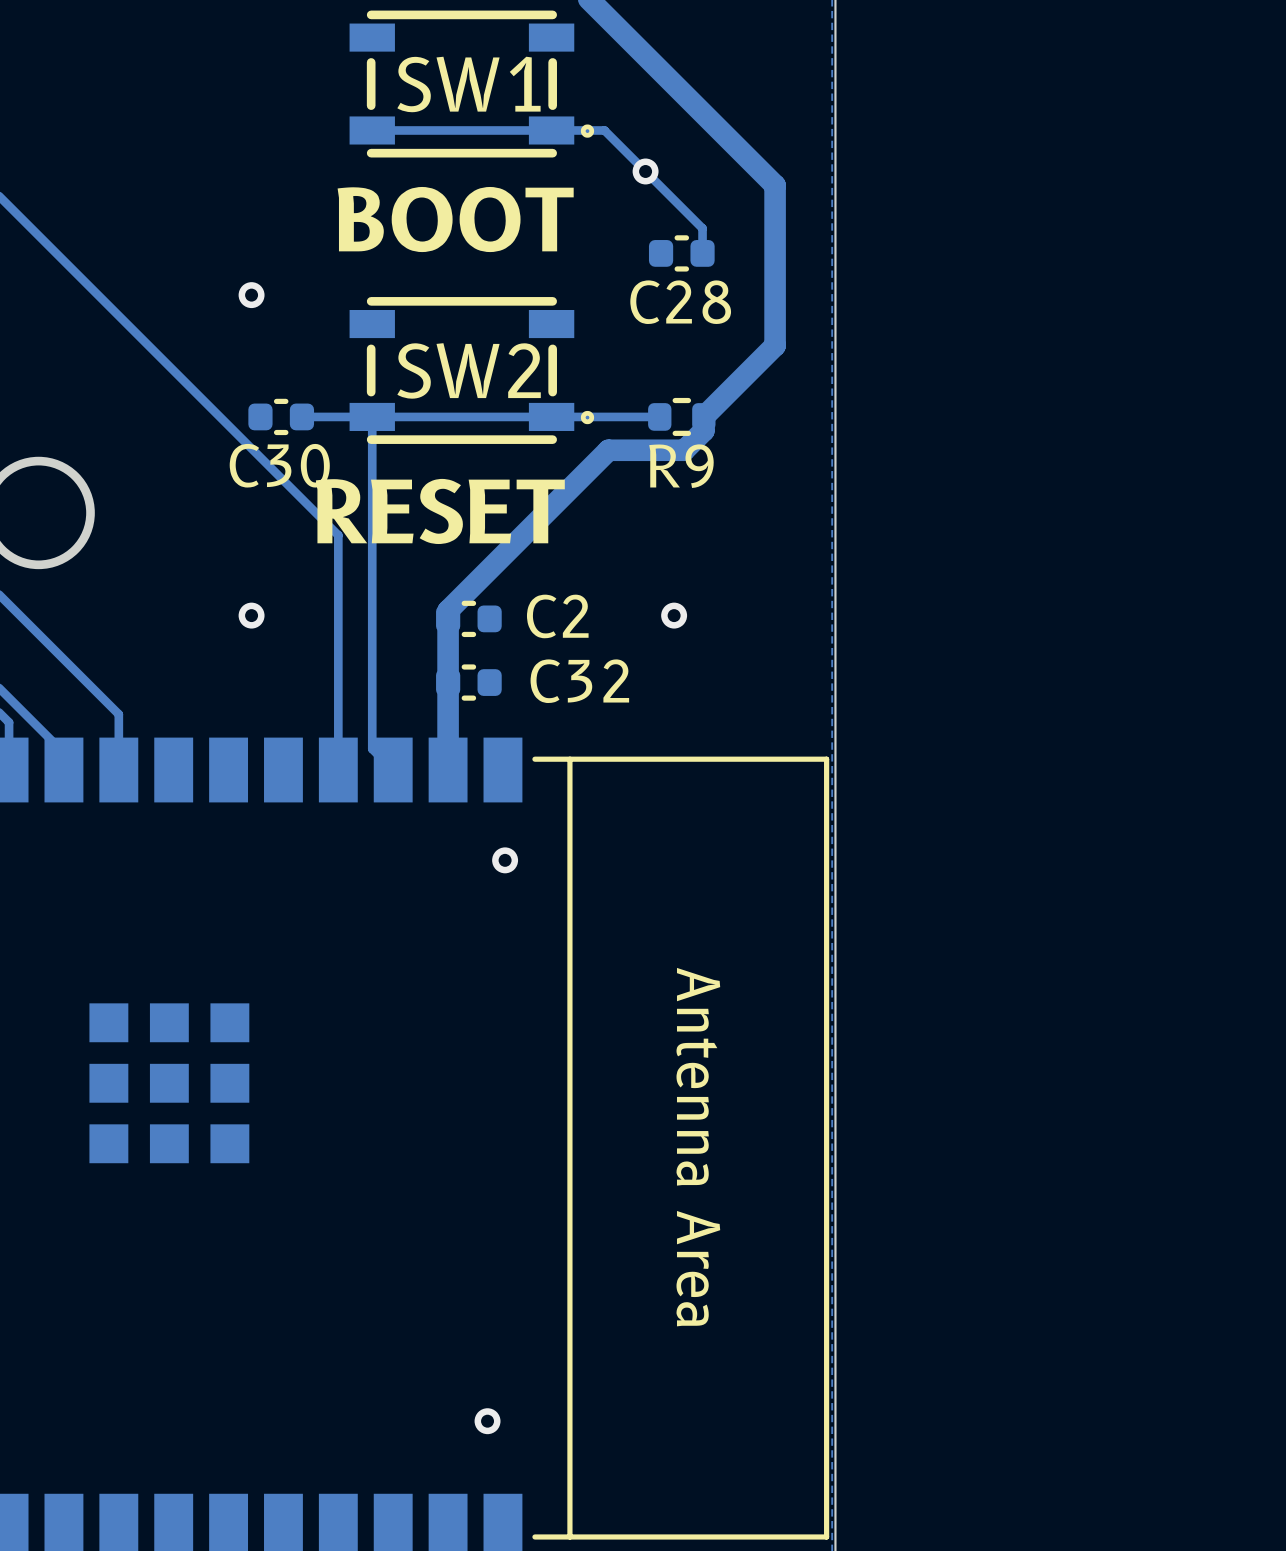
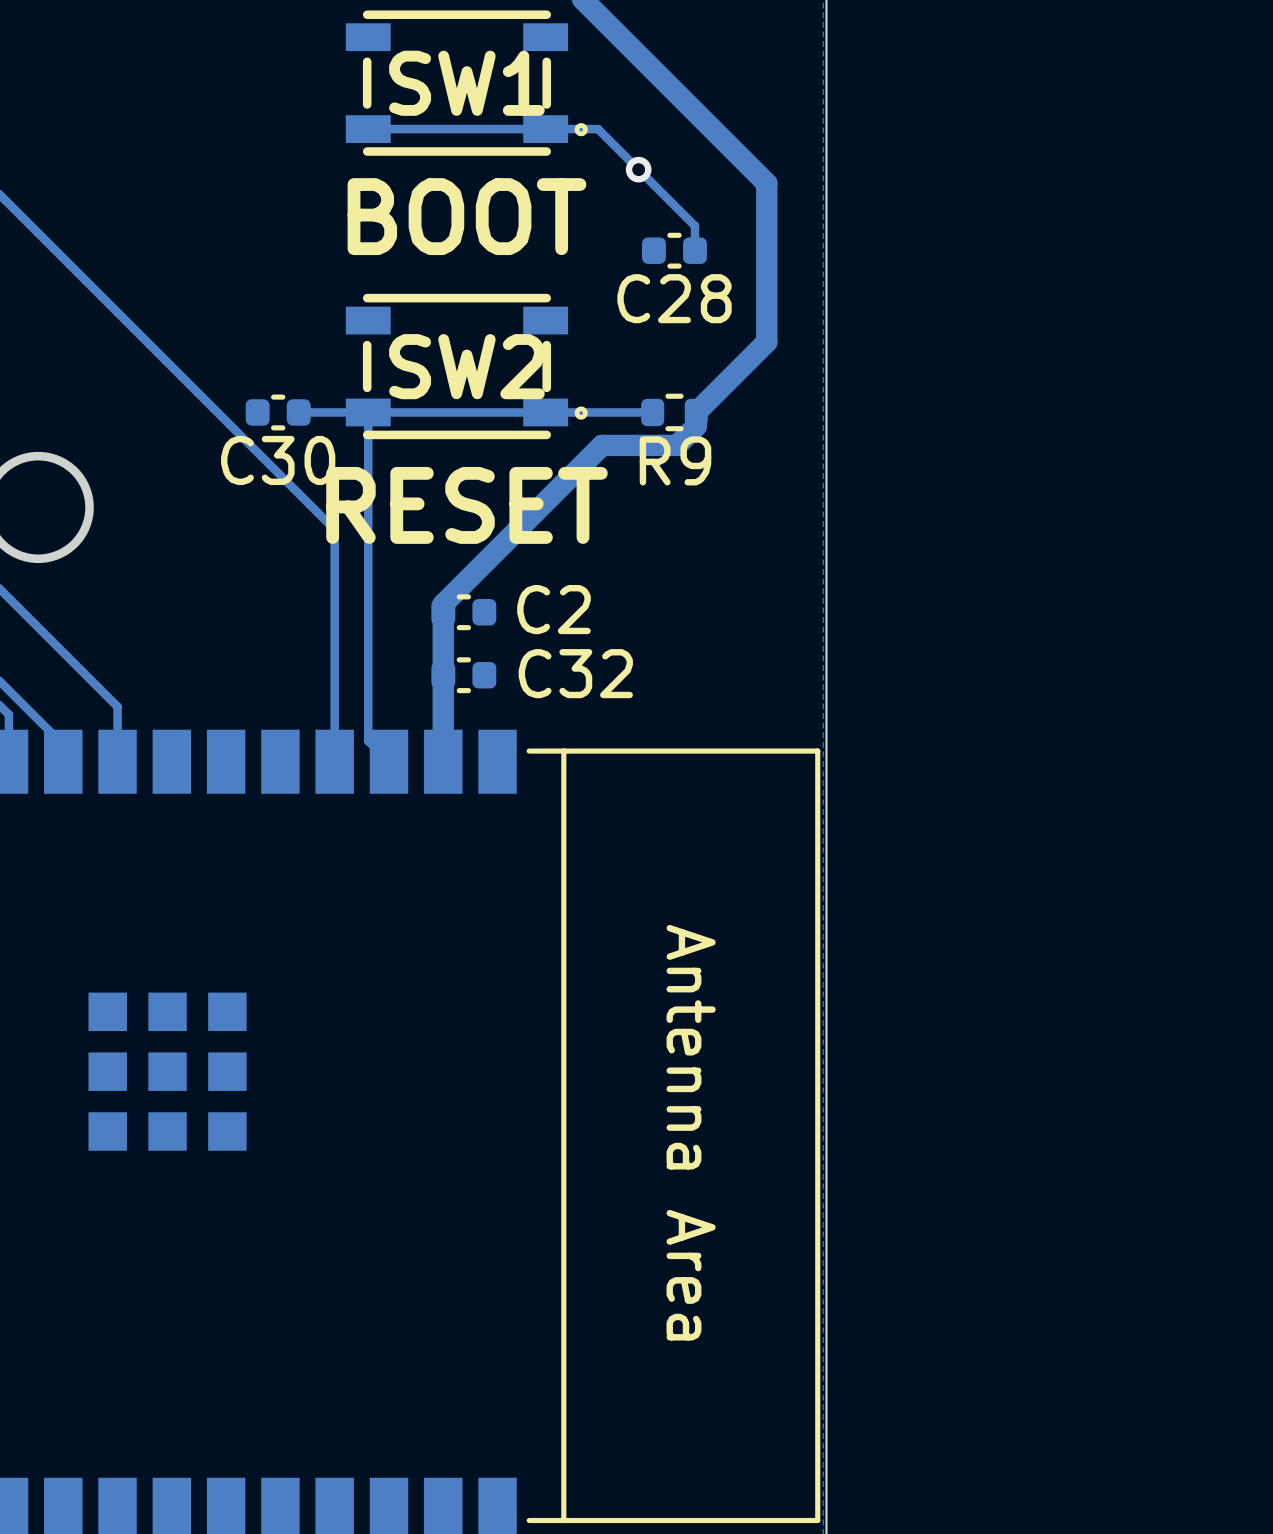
via: (251, 295) -> none
via: (251, 615) -> none
via: (674, 615) -> none
via: (505, 860) -> none
via: (487, 1421) -> none

